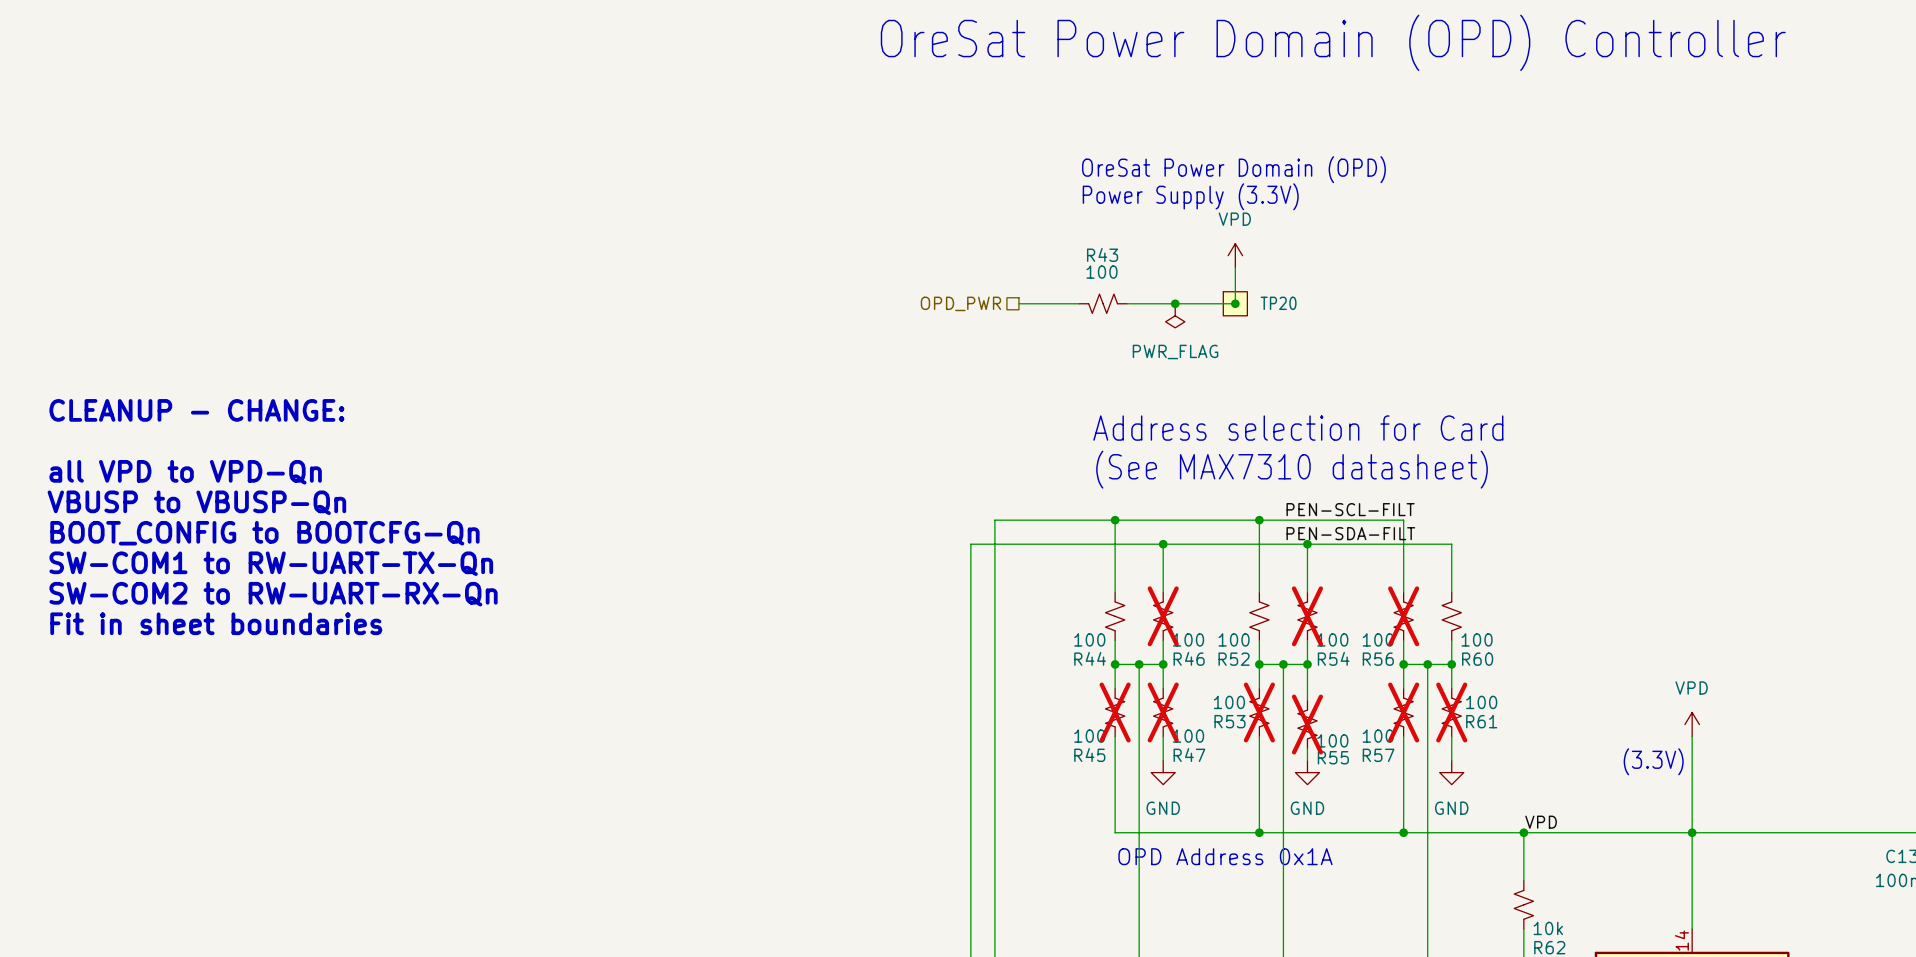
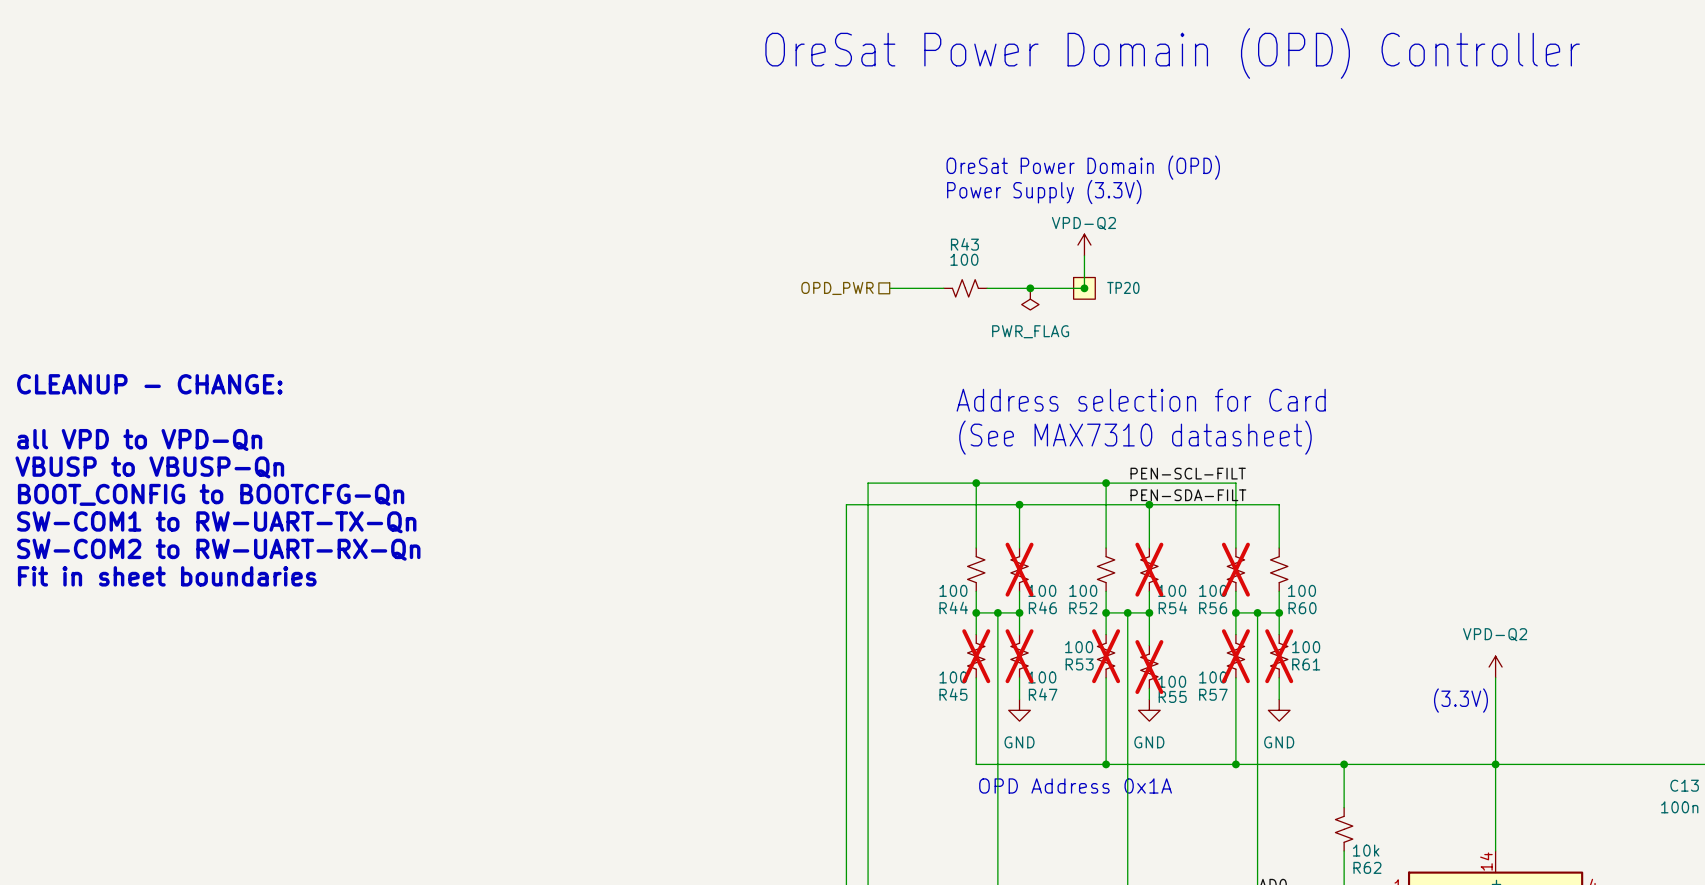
power symbol: VPD (1235, 255) -> VPD-Q2 (1084, 245)
power symbol: VPD (1692, 724) -> VPD-Q2 (1495, 667)
label: VPD (1541, 822) -> none

